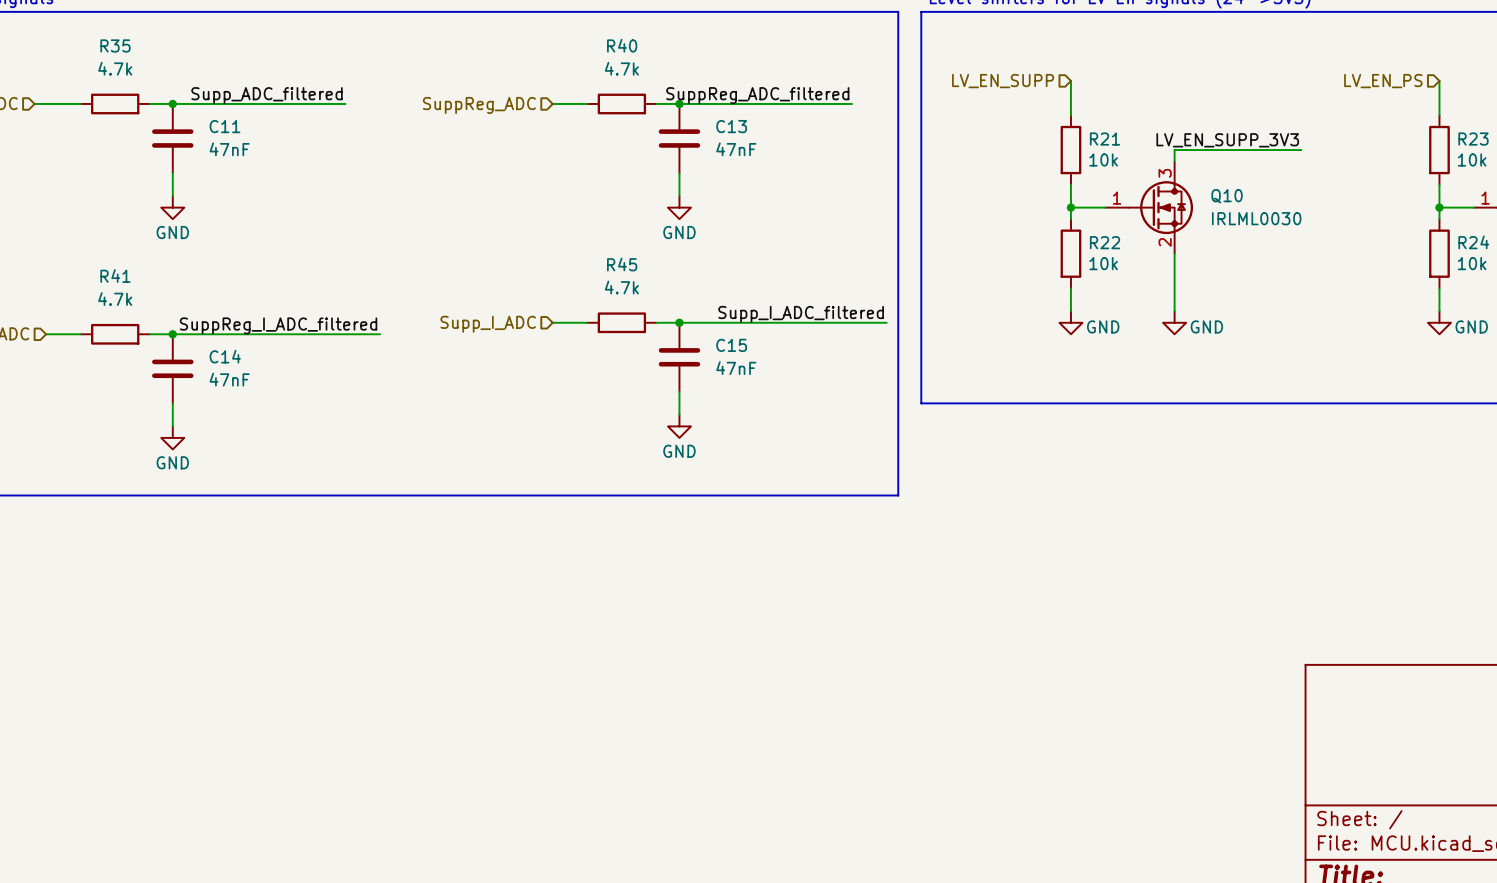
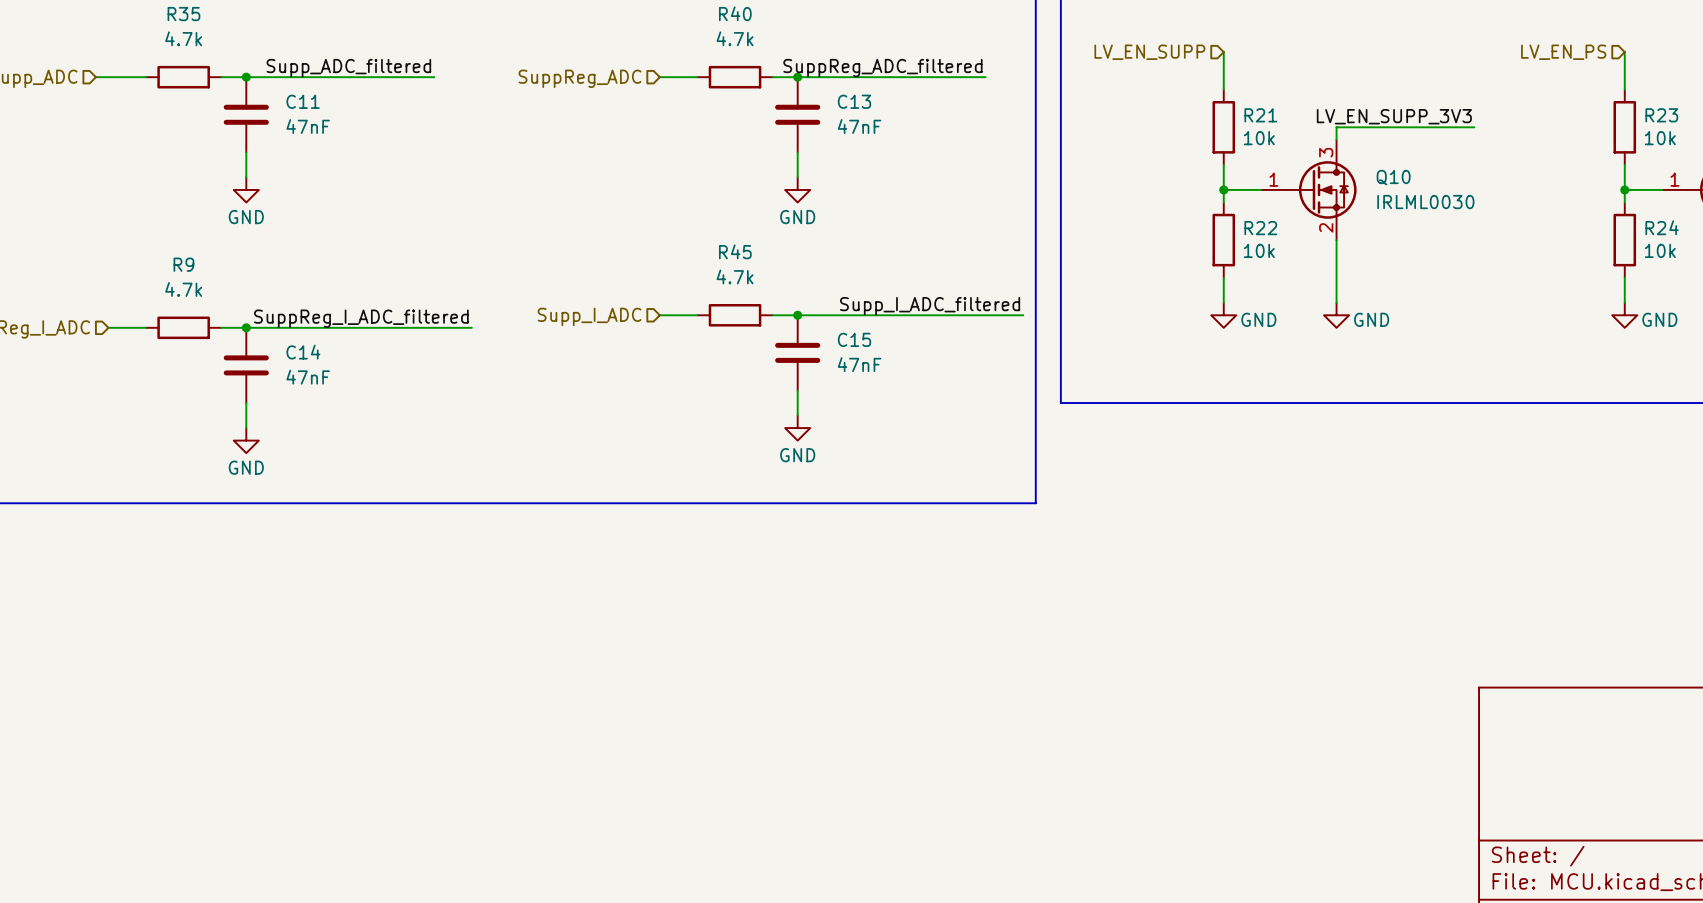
R41 name: R41 (115, 276) -> R9 (183, 264)

